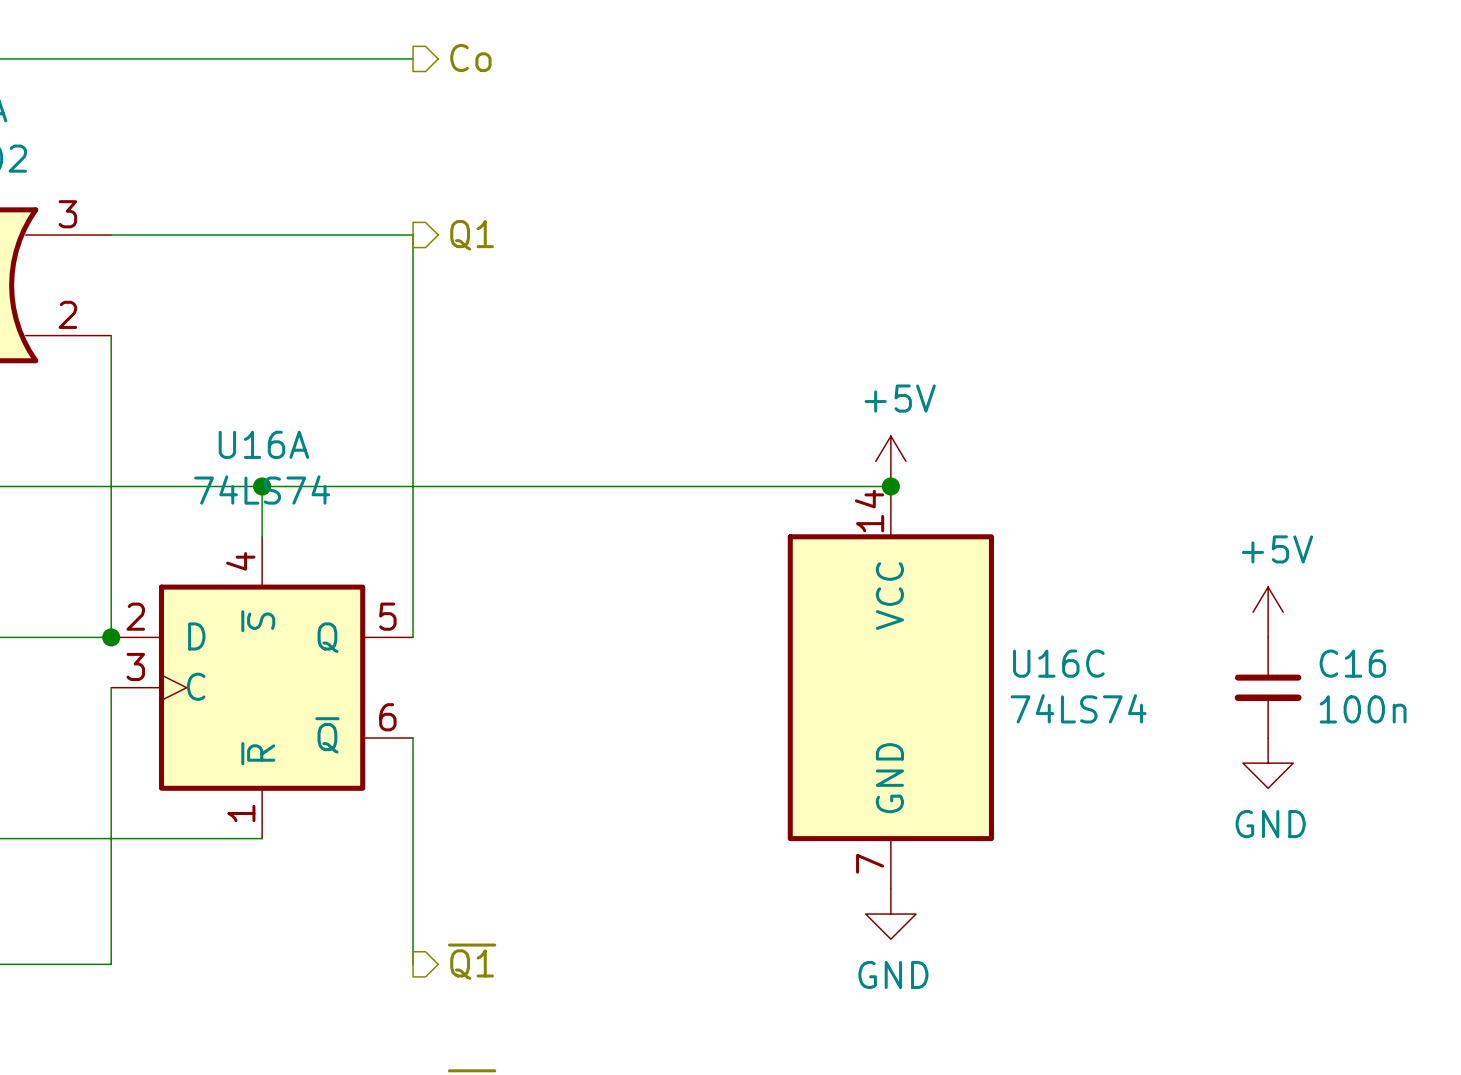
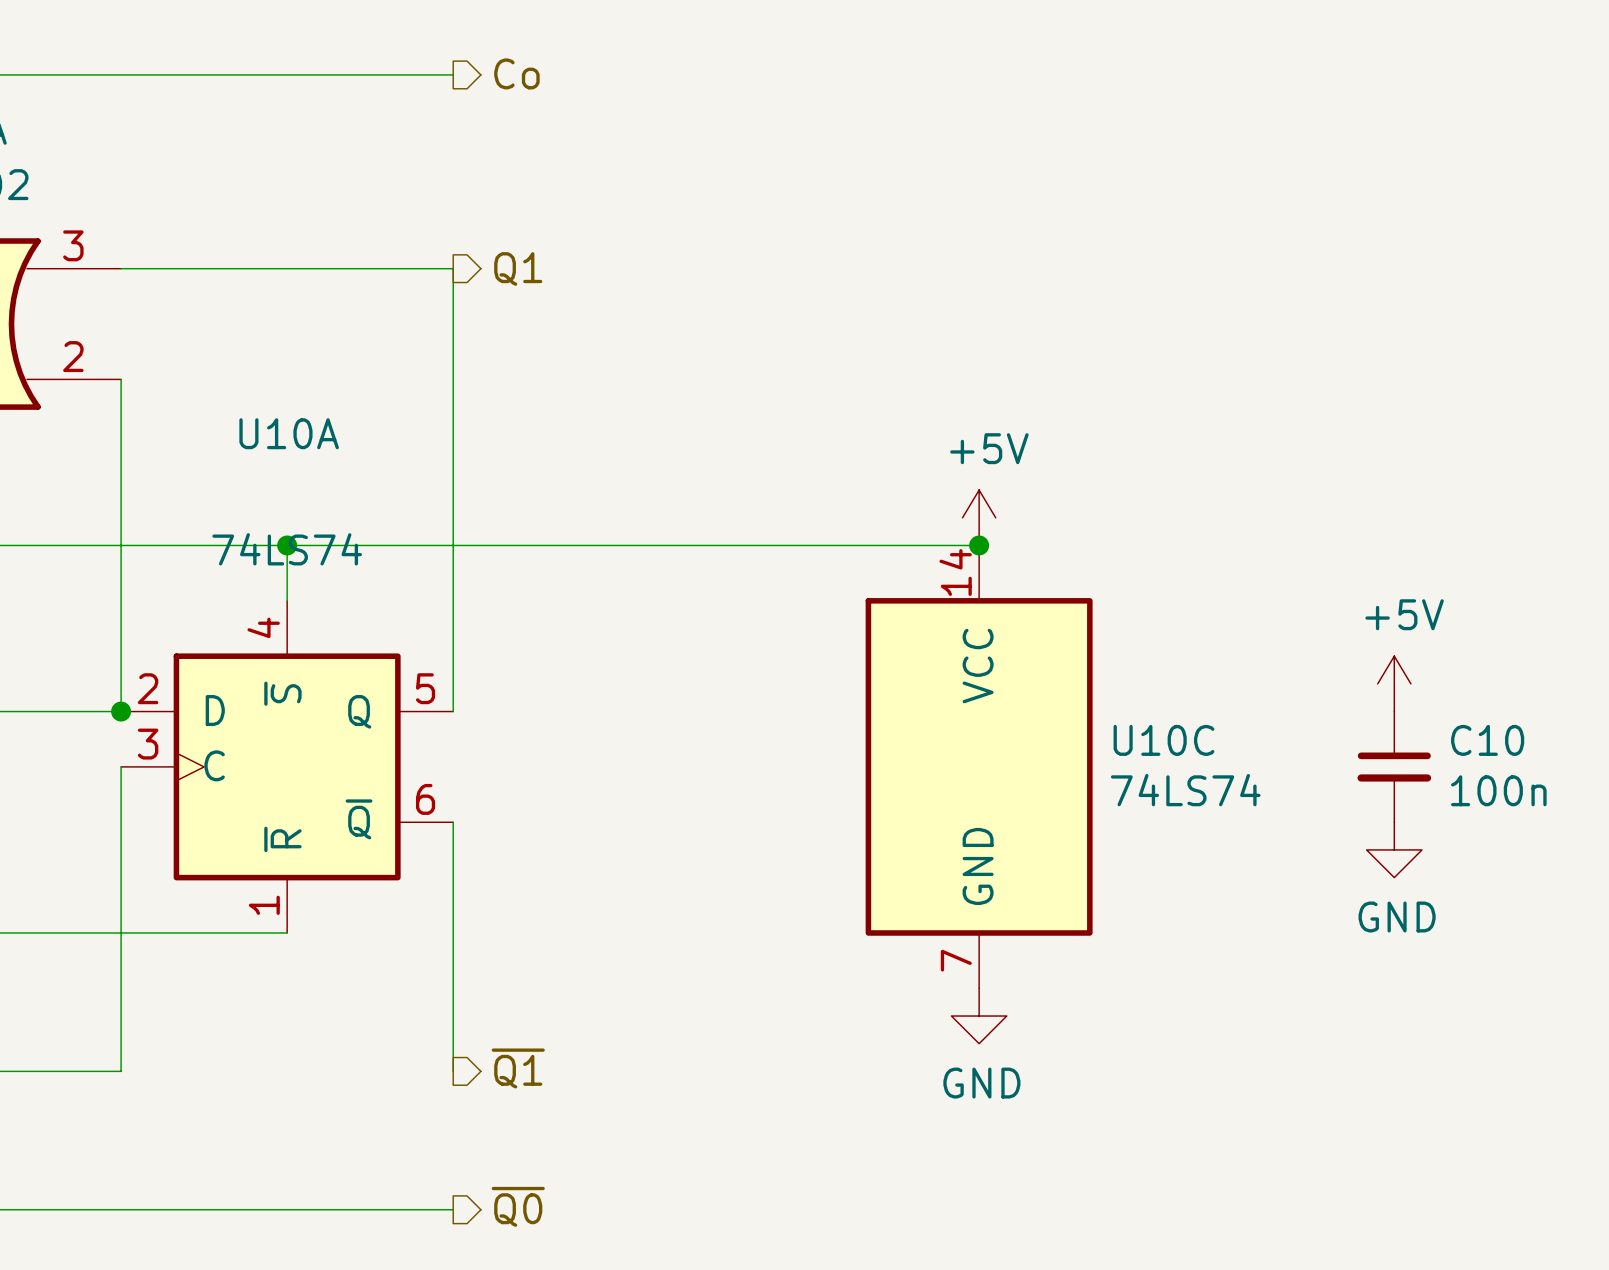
U16A name: U16A (263, 444) -> U10A (289, 433)
U16C name: U16C (1058, 663) -> U10C (1163, 740)
C16 name: C16 (1352, 663) -> C10 (1487, 740)

